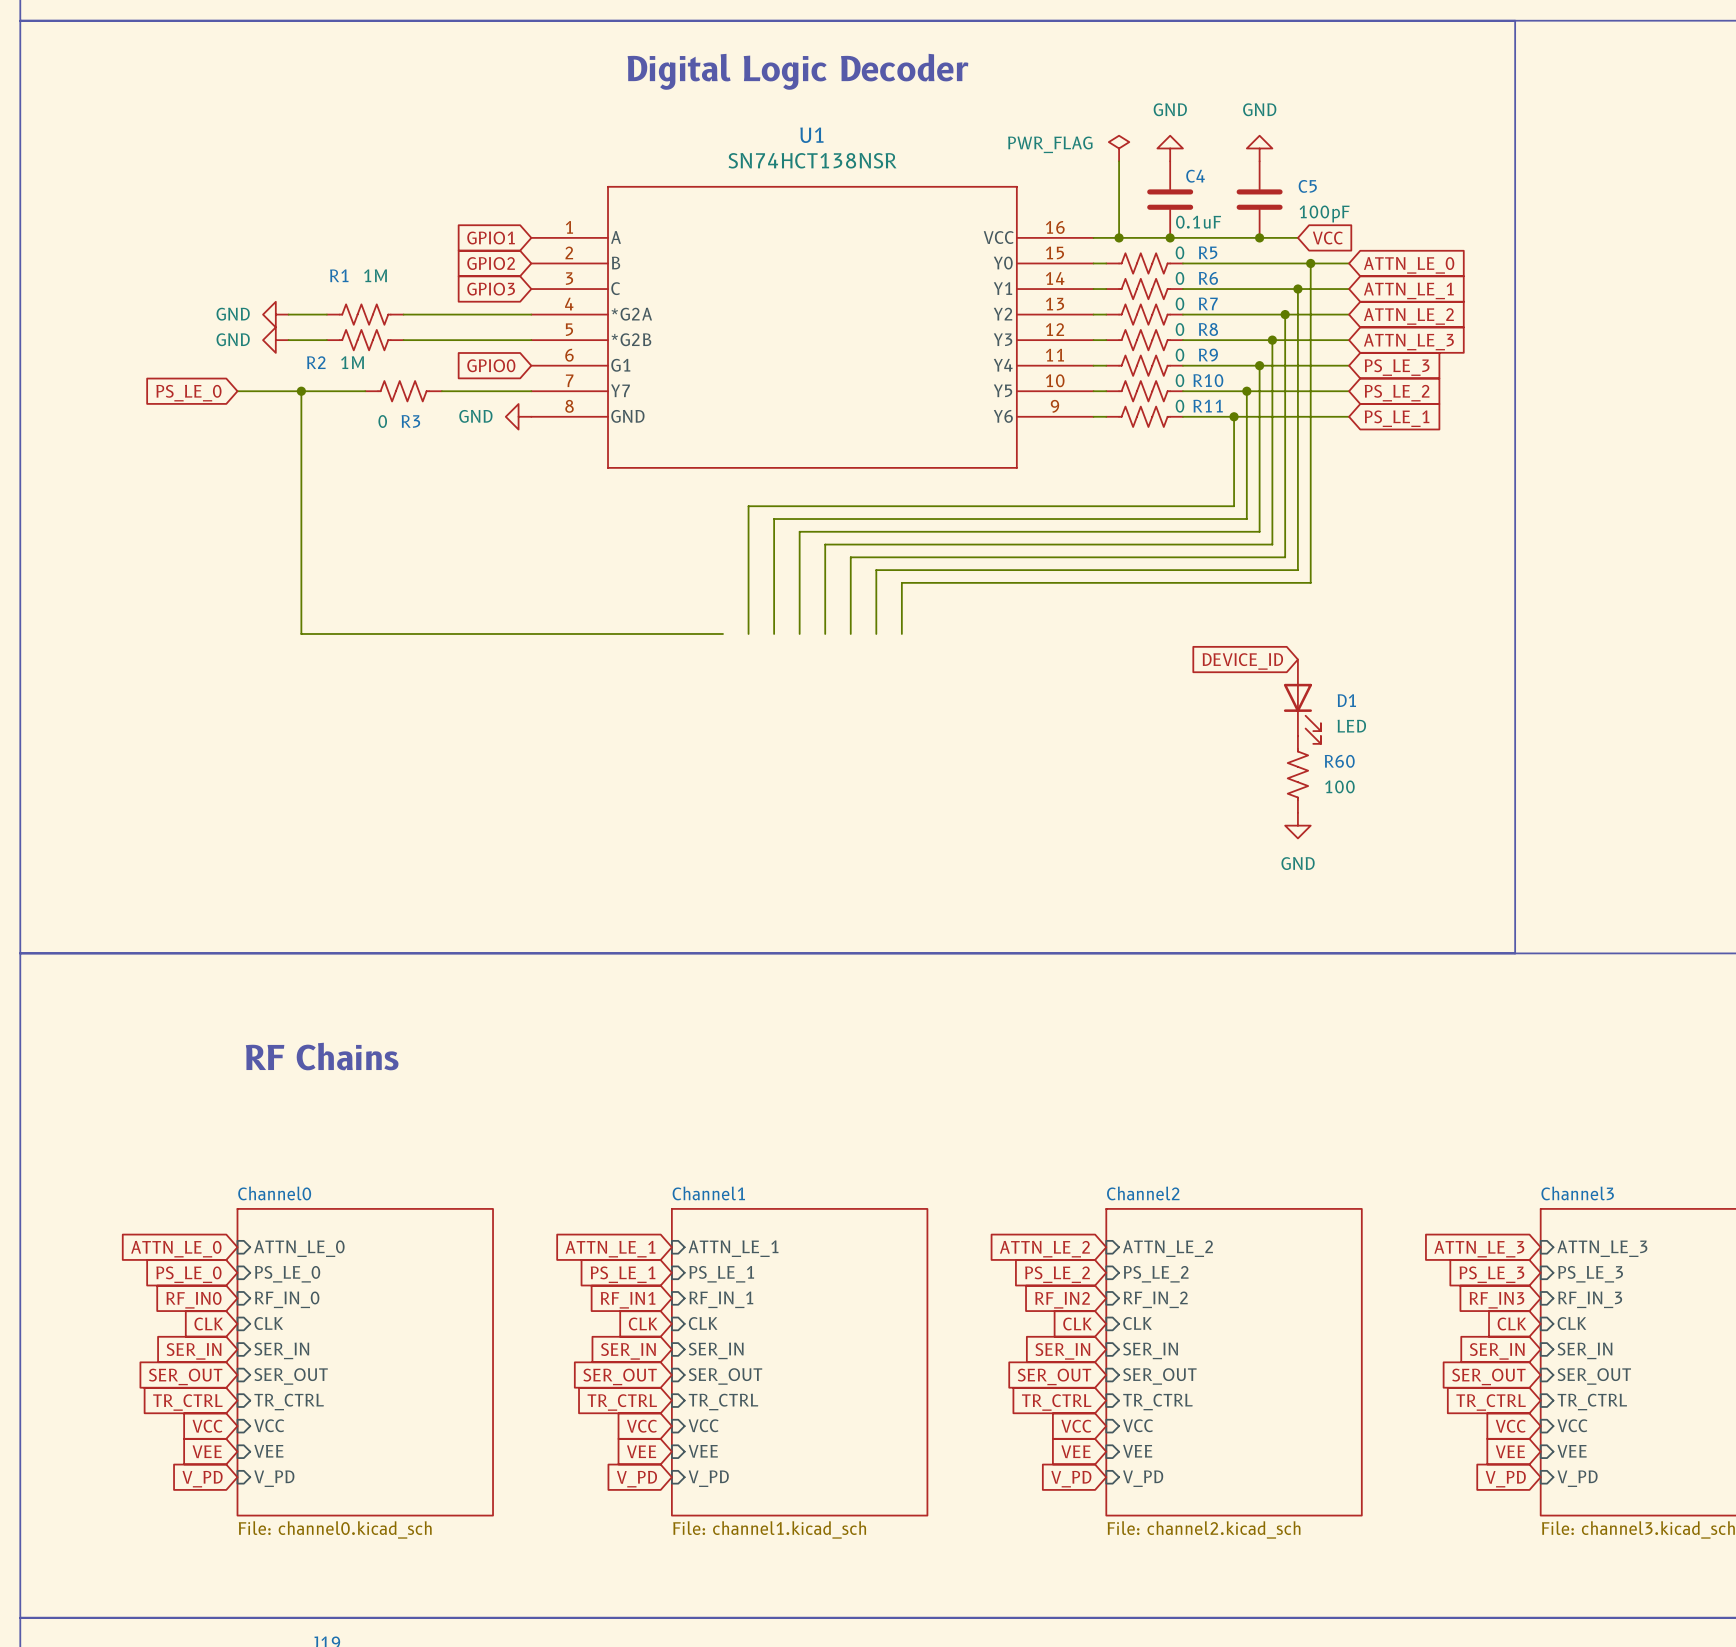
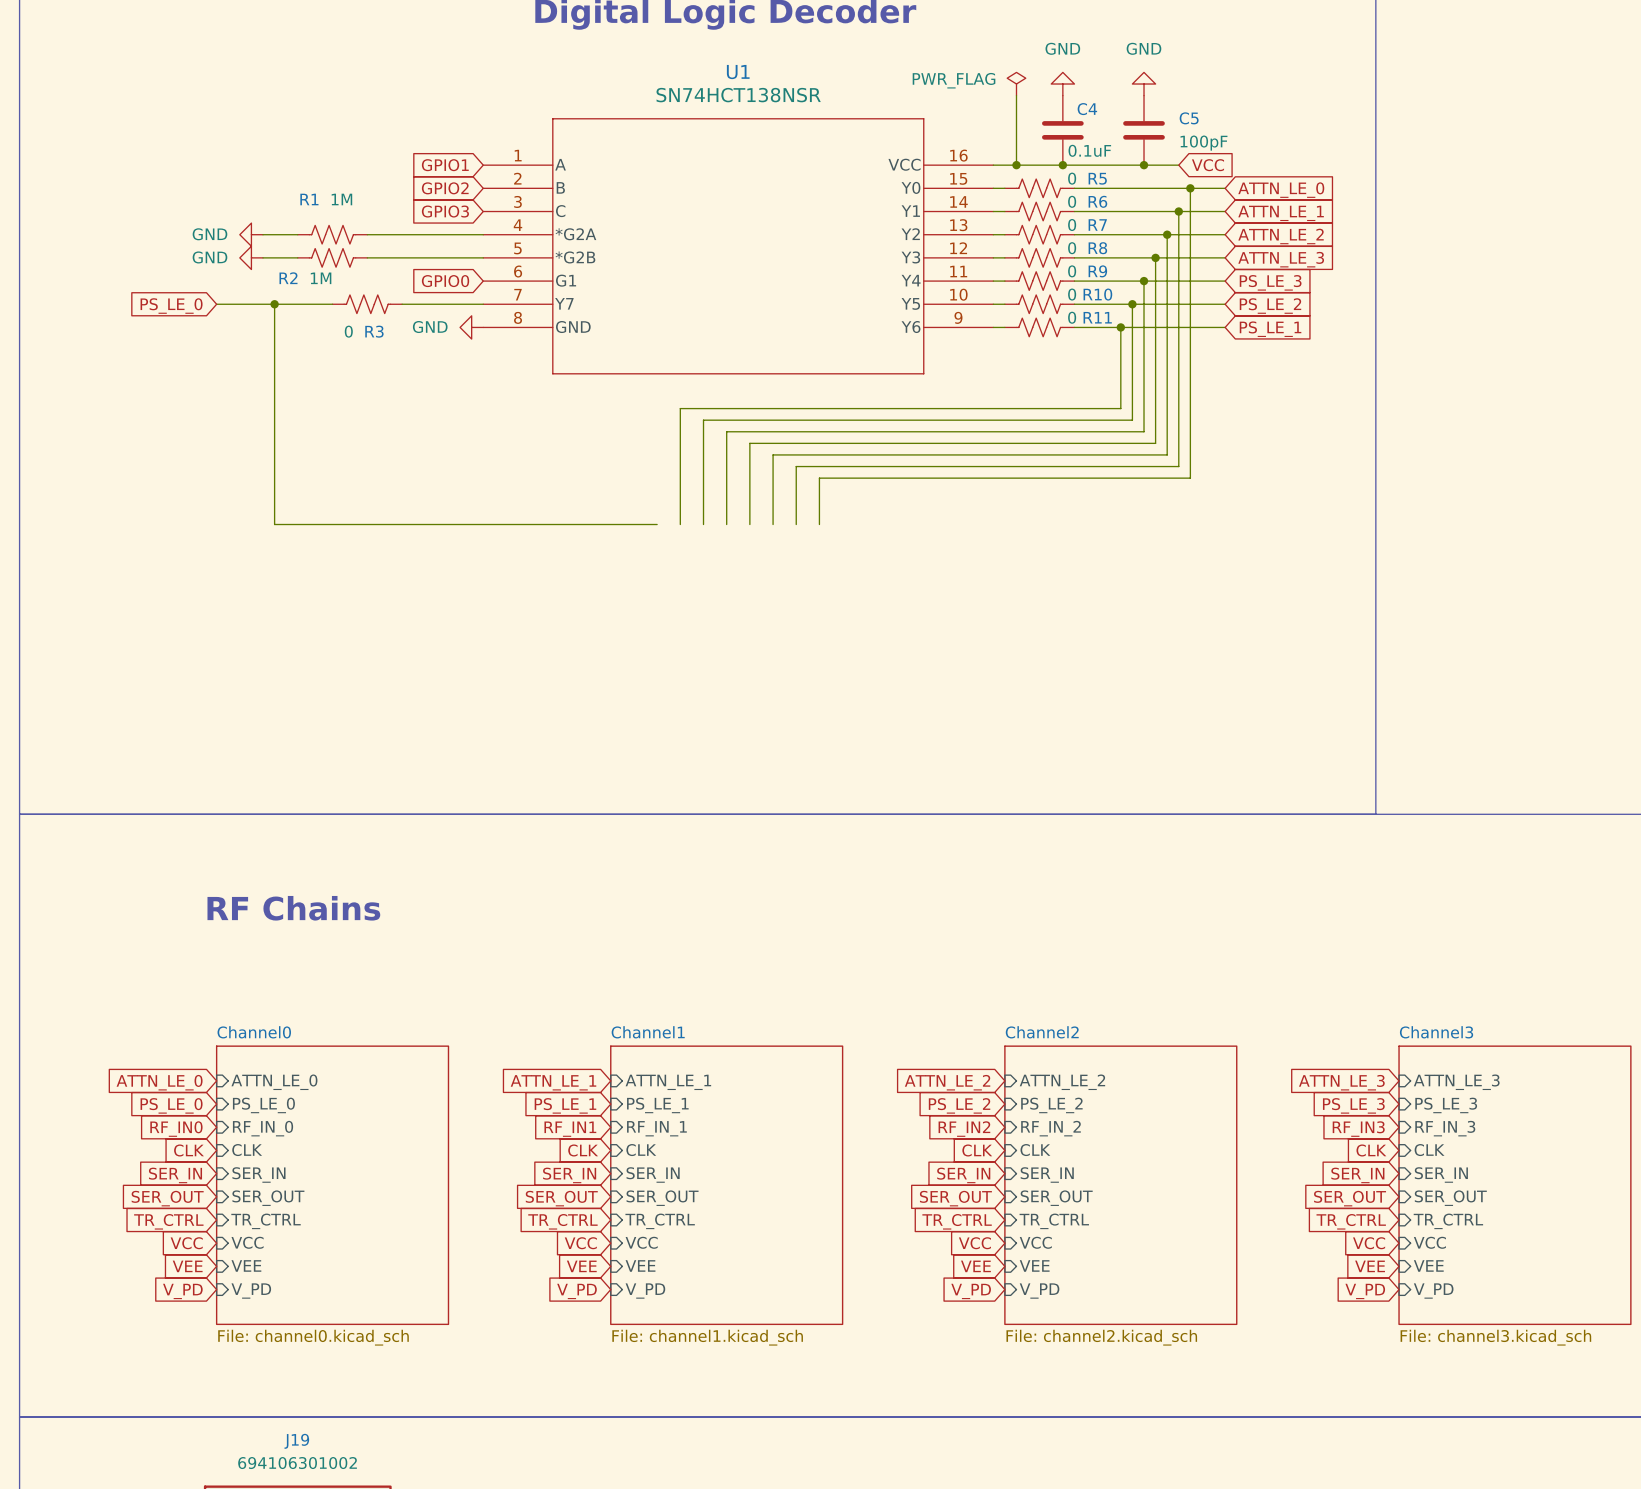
global label: DEVICE_ID (1242, 661) -> none
D1: LED (1302, 701) -> none
R60: 100 (1297, 774) -> none
power symbol: GND (1297, 825) -> none

